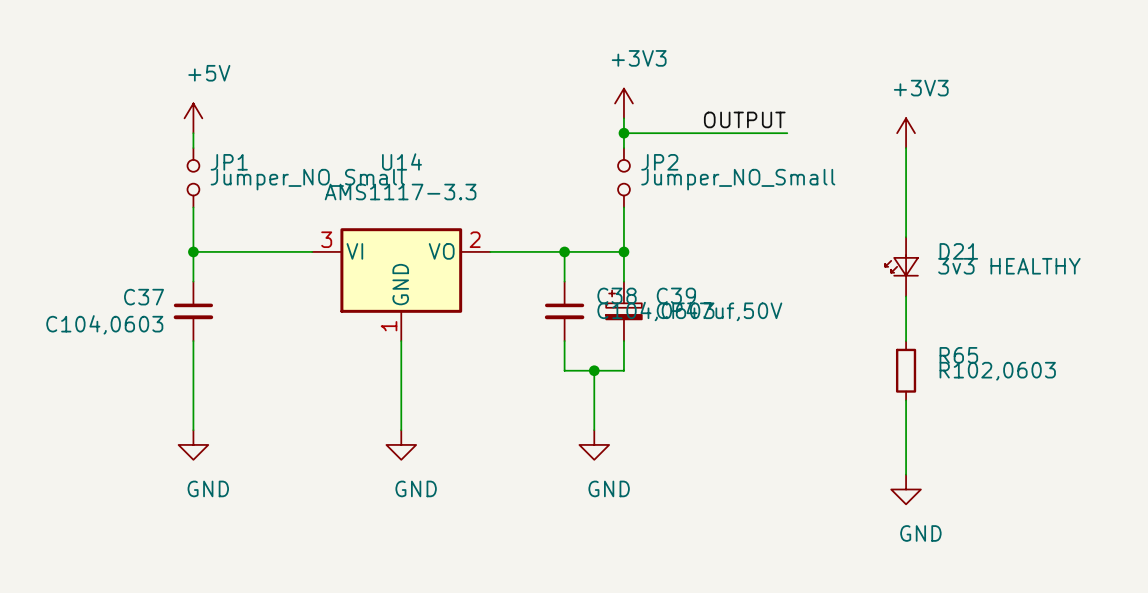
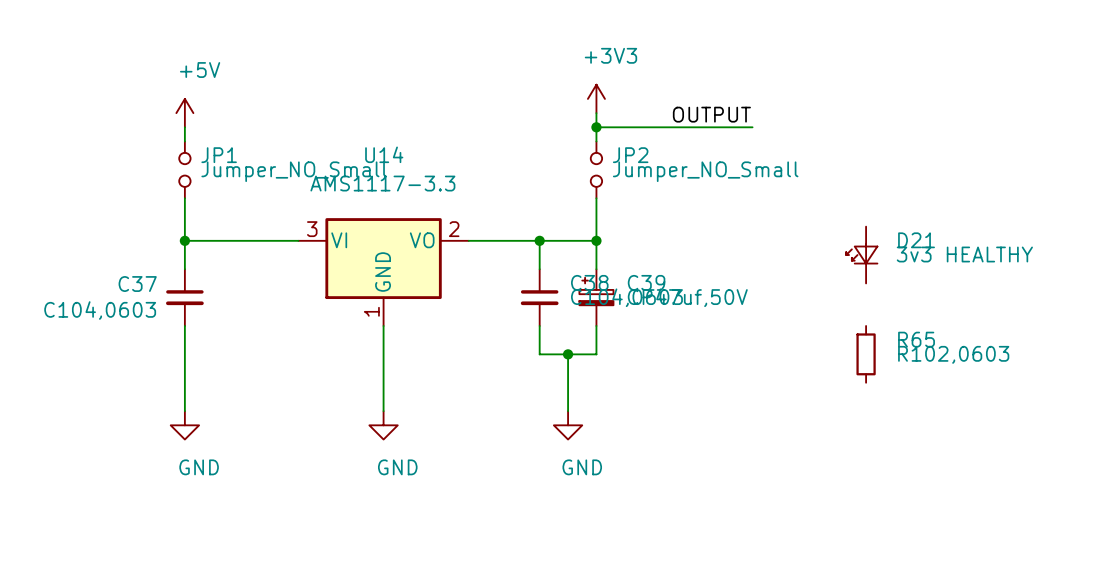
power symbol: +3V3 (906, 133) -> none
wire: (906, 148) (906, 237) -> none
wire: (906, 296) (906, 341) -> none
wire: (906, 400) (906, 474) -> none
power symbol: GND (906, 489) -> none

